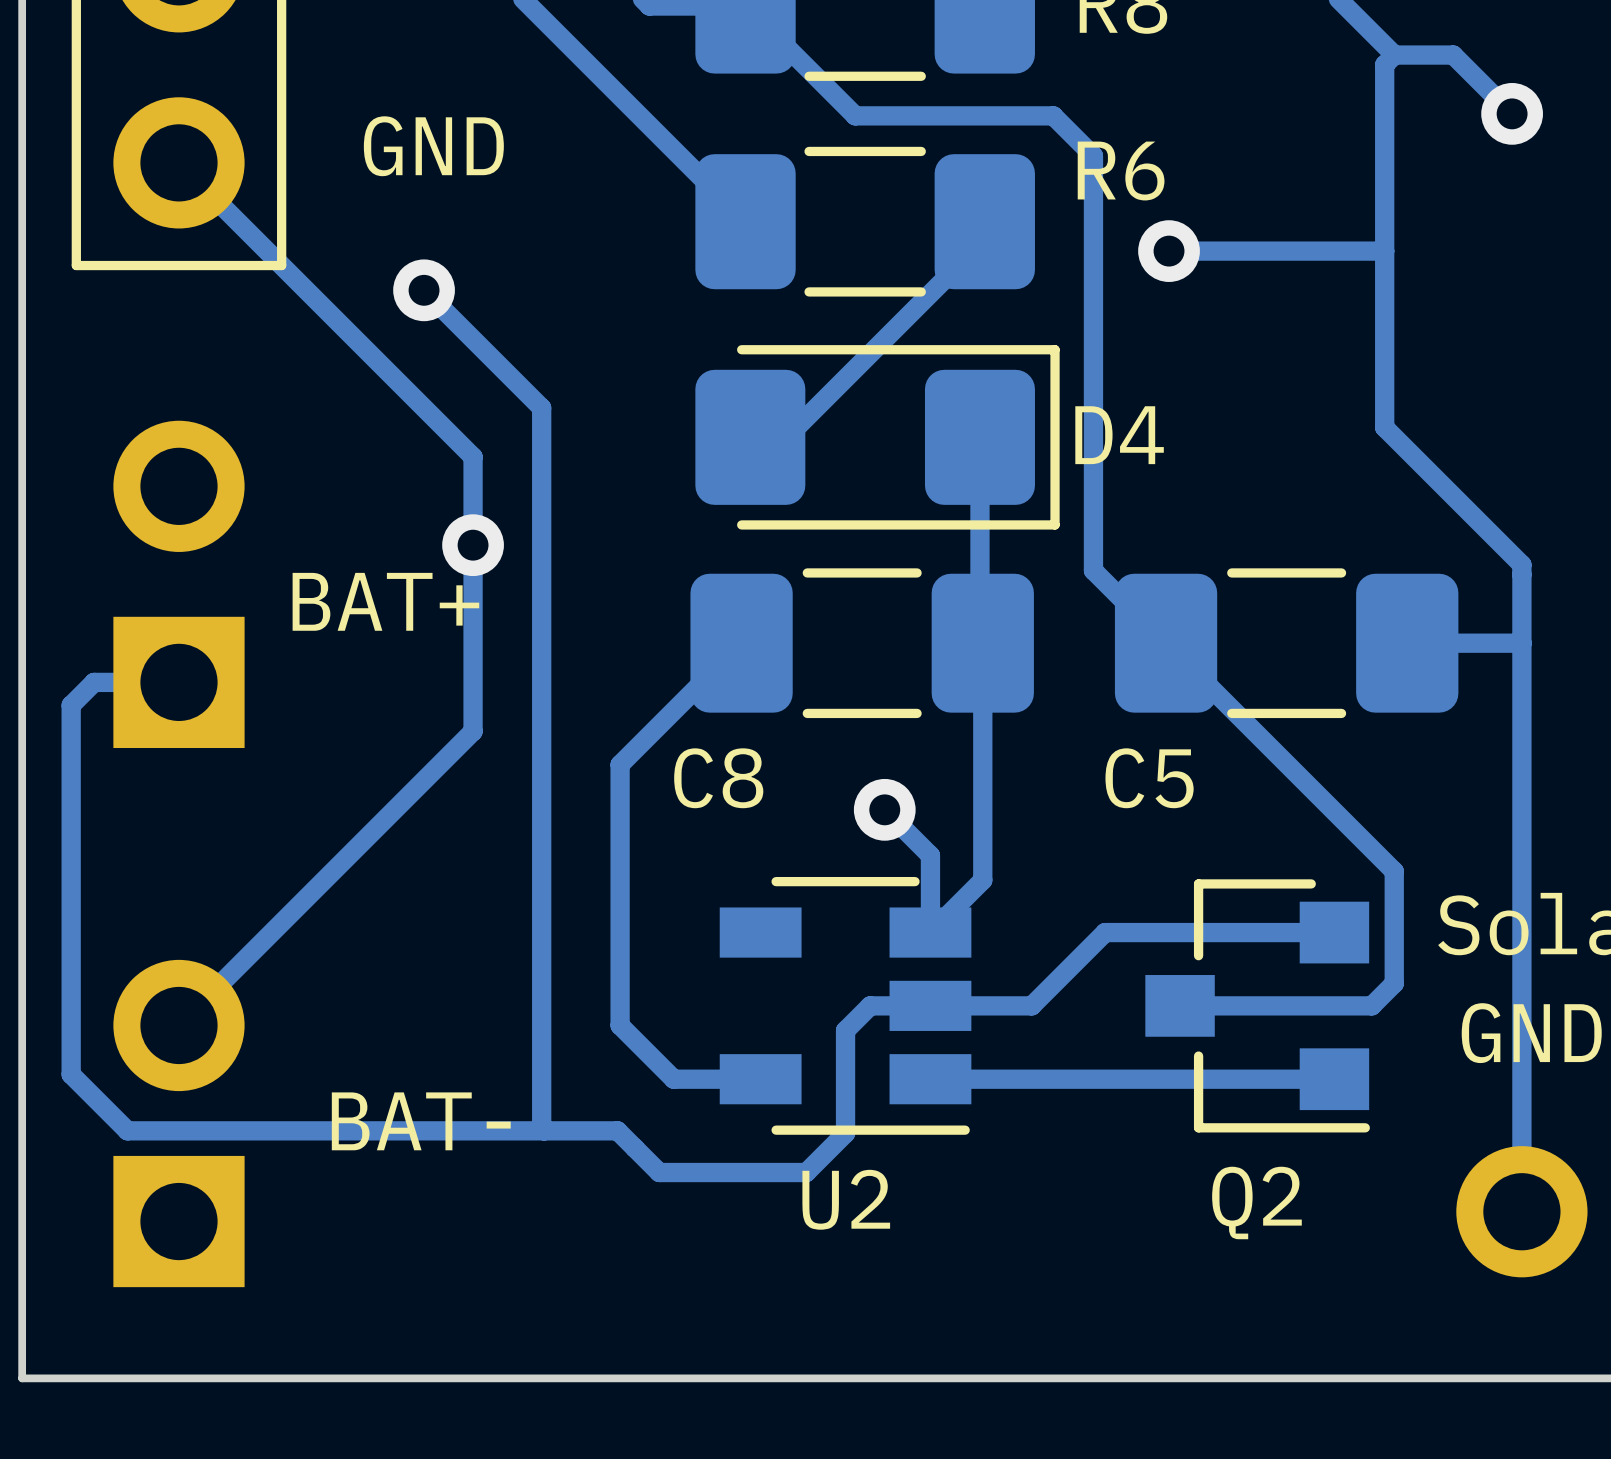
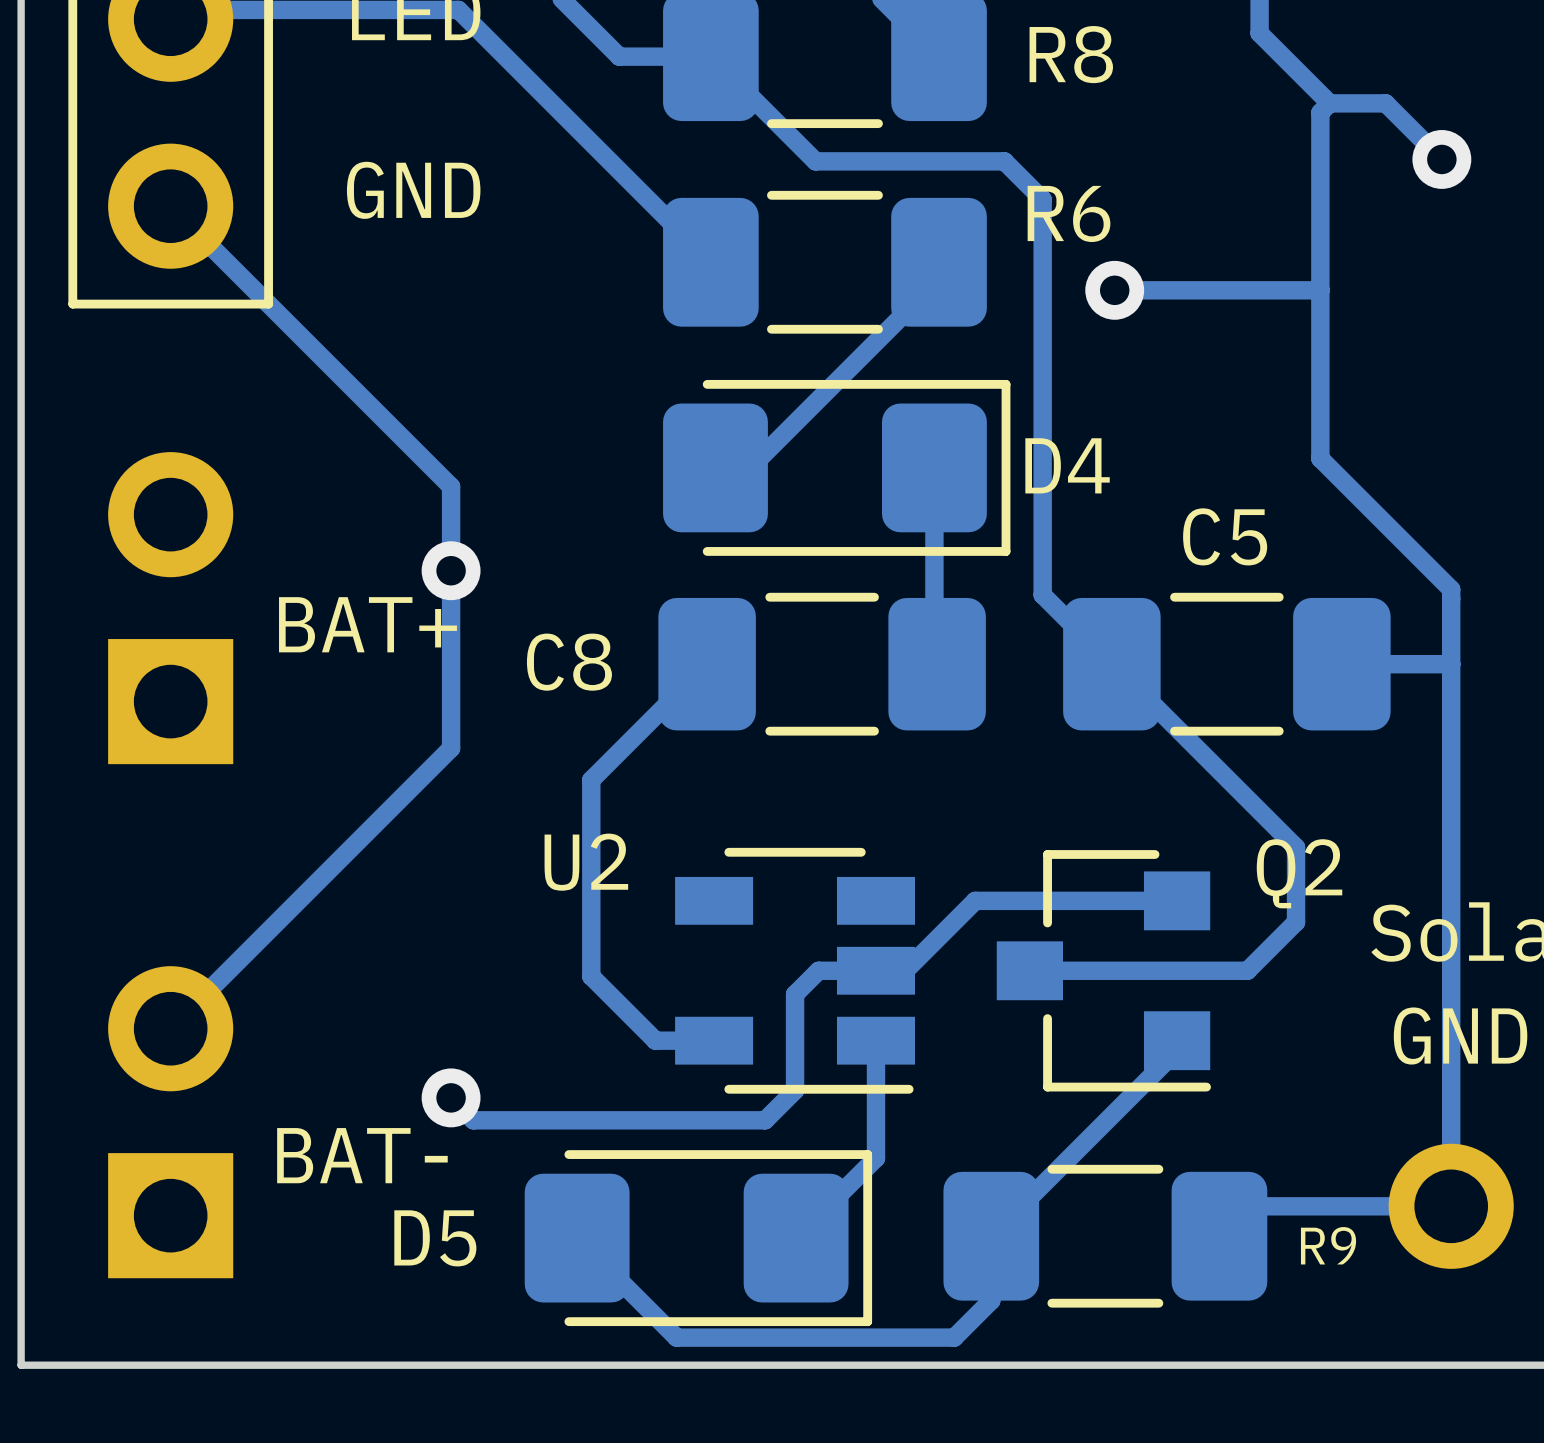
track: (424, 290) (541, 407) (541, 1128) (544, 1130) -> none
via: (424, 290) -> none
track: (982, 643) (982, 880) (930, 932) (930, 855) (884, 809) -> none
track: (1166, 643) (1394, 871) (1394, 983) (1371, 1005) (1180, 1005) -> (1112, 664) (1296, 847) (1296, 922) (1247, 970) (1029, 970)
track: (178, 682) (94, 682) (71, 705) (71, 1074) (127, 1130) (617, 1130) (659, 1172) (806, 1172) (845, 1133) (845, 1030) (870, 1005) (1031, 1005) (1105, 932) (1334, 932) -> none
C8 name position: C8 (718, 778) -> C8 (569, 662)
C5 name position: C5 (1149, 778) -> C5 (1225, 536)
via: (884, 809) -> none
track: none -> (1177, 900) (975, 900) (905, 970) (818, 970) (795, 994) (795, 1090) (765, 1120) (473, 1120) (451, 1097)
track: (620, 970) (620, 1025) (673, 1079) (760, 1079) -> (591, 976) (655, 1040) (714, 1040)
U2 position: (845, 1005) -> (795, 970)
Q2 position: (1257, 1005) -> (1103, 970)
track: none -> (876, 1040) (876, 1158) (796, 1238)
track: none -> (1177, 1040) (1177, 1050) (991, 1236) (991, 1300) (954, 1337) (676, 1337) (577, 1238)
track: (1334, 1079) (930, 1079) -> none
via: none -> (451, 1097)
text position: BAT- (421, 1121) -> BAT- (362, 1155)
U2 name position: U2 (846, 1199) -> U2 (586, 862)
Q2 name position: Q2 (1256, 1202) -> Q2 (1299, 873)
R9: none -> (1105, 1236)
track: none -> (1219, 1236) (1249, 1206) (1451, 1206) (1413, 1243)
D5: none -> (698, 1238)

